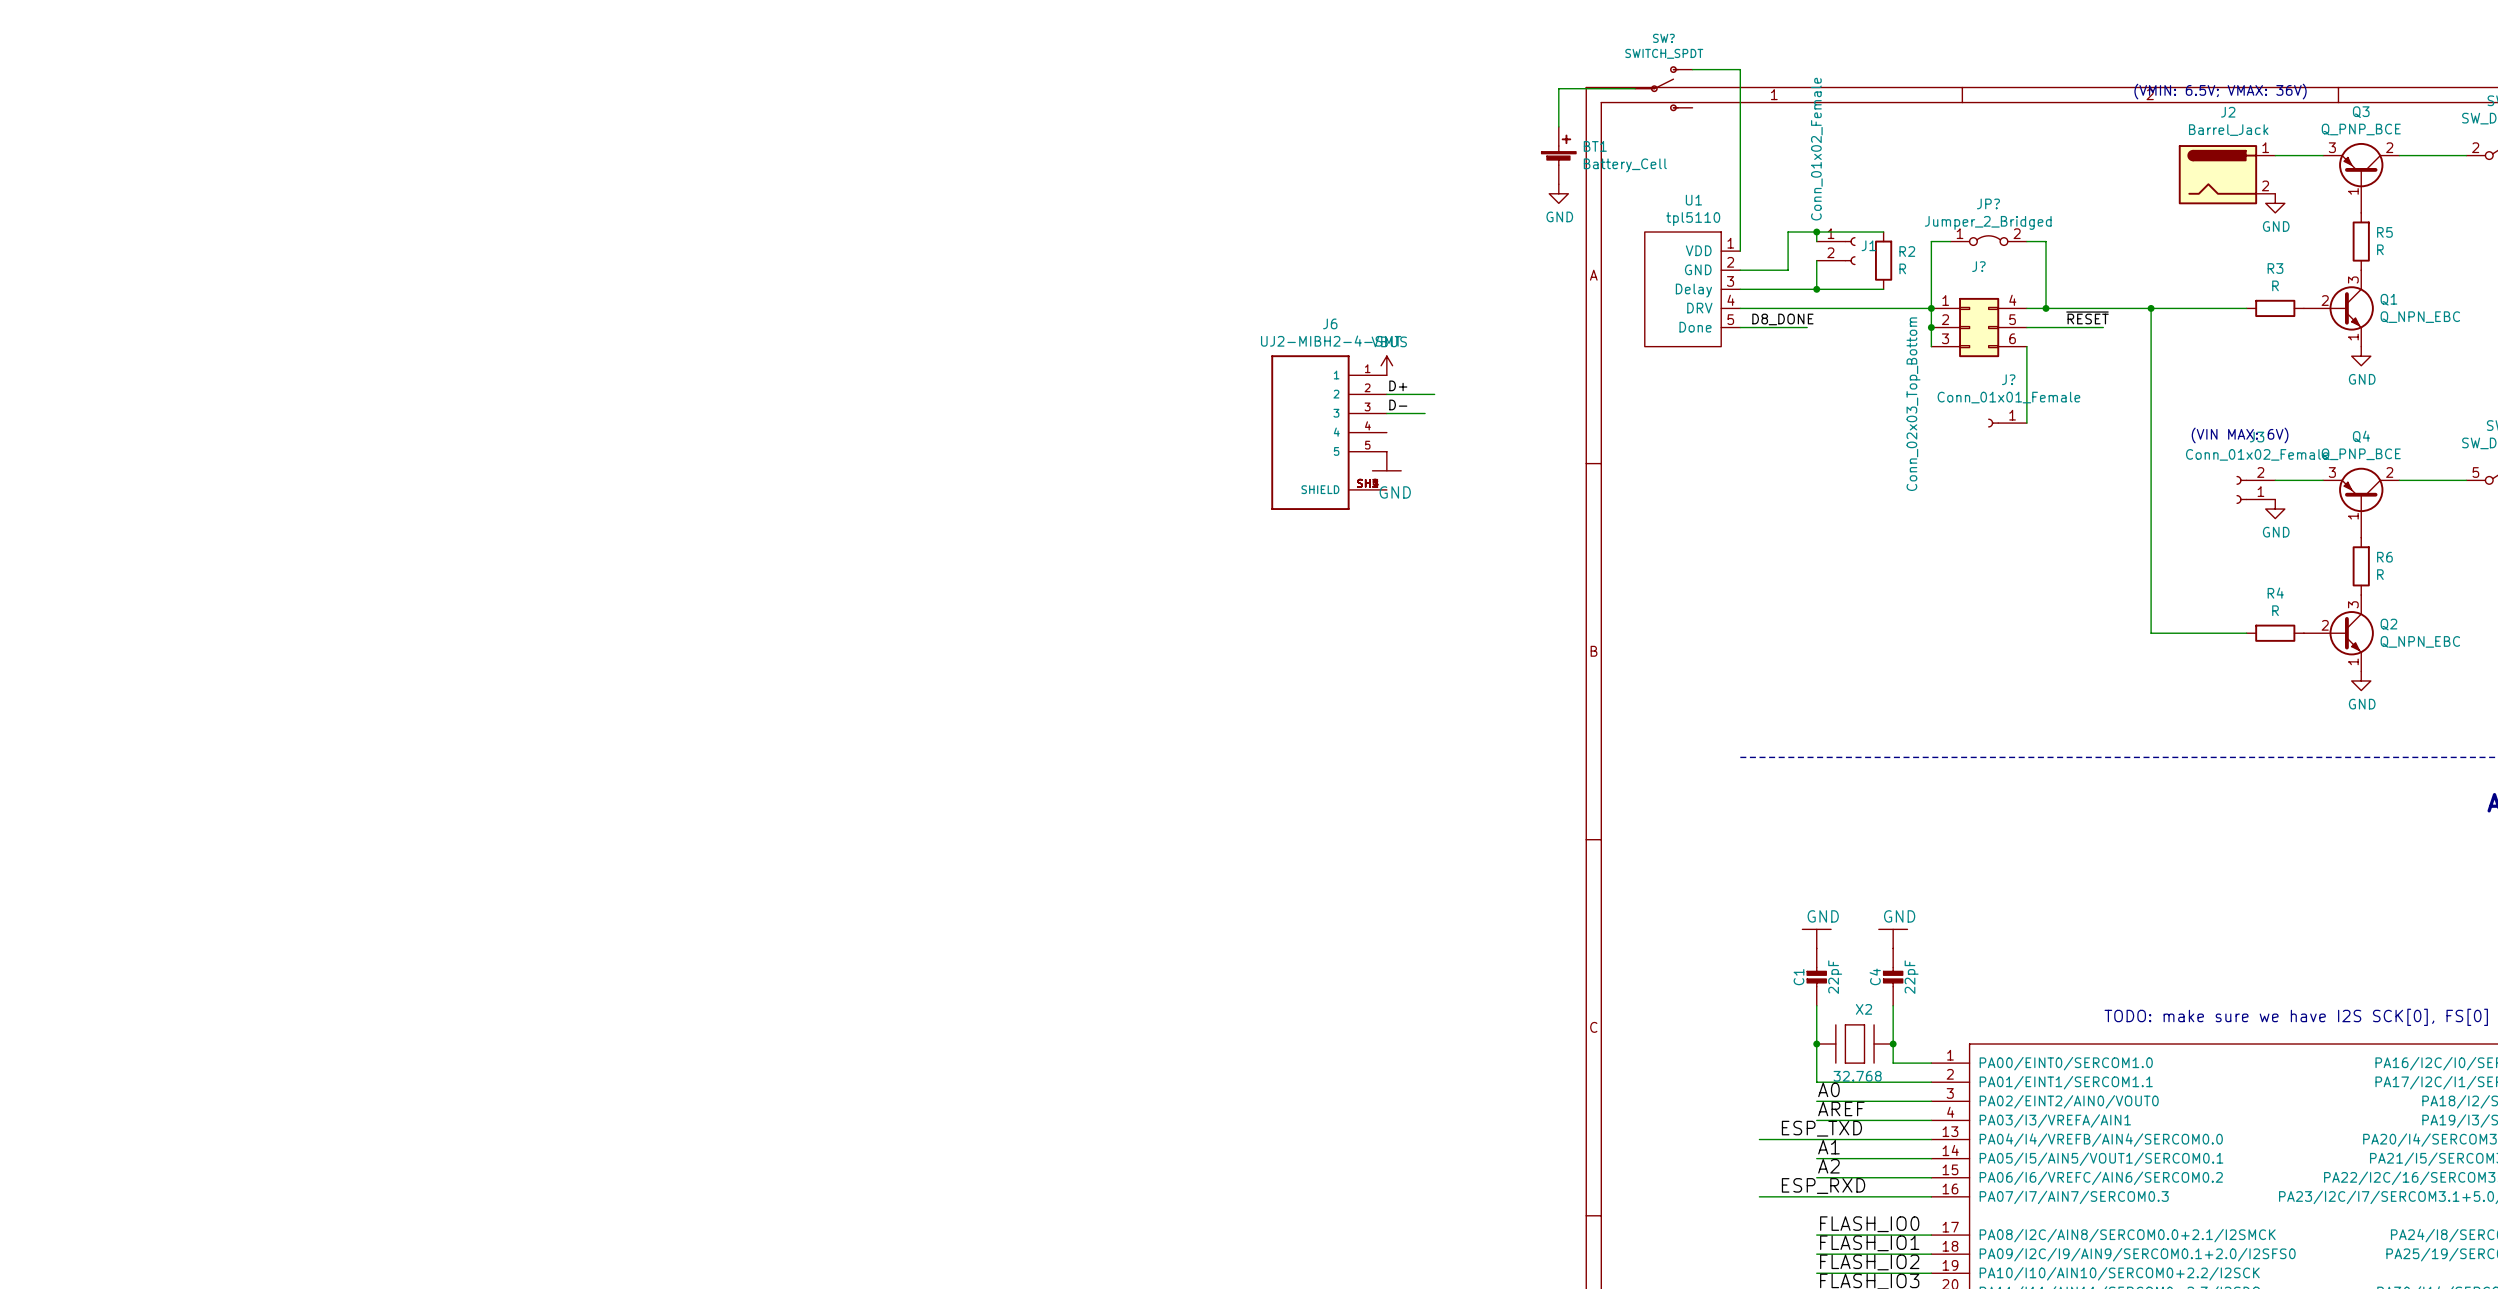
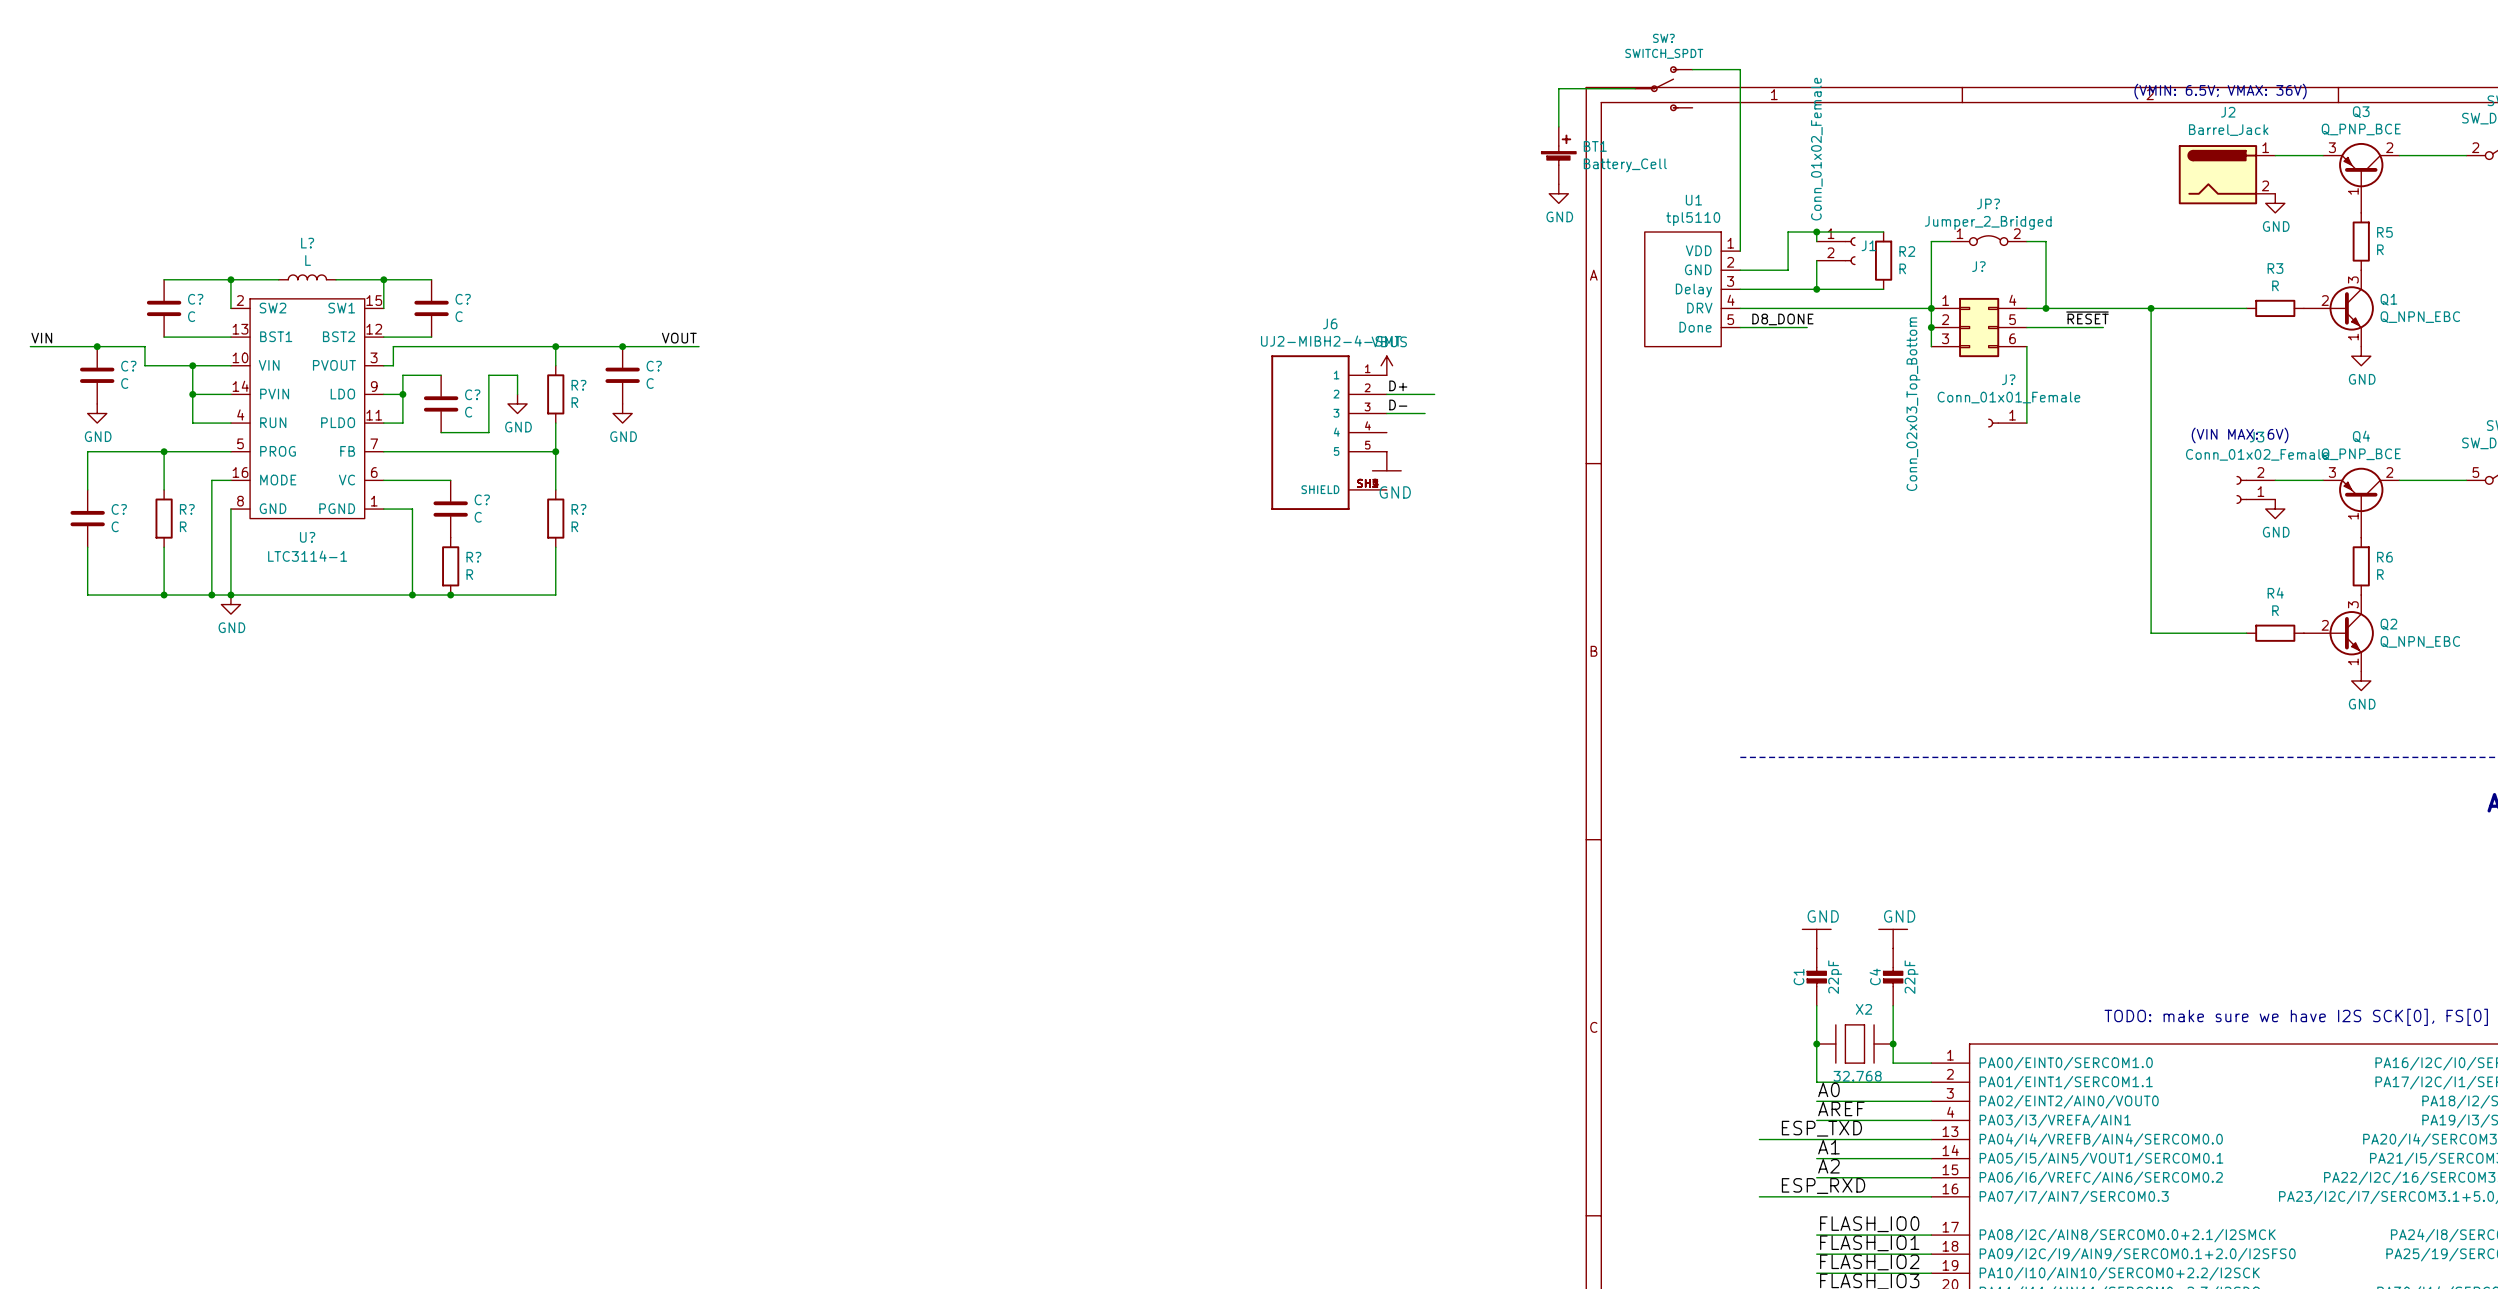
L?: none -> L (307, 277)
wire: none -> (164, 279) (278, 279)
wire: none -> (230, 279) (230, 308)
junction: none -> (230, 279)
wire: none -> (336, 279) (431, 279)
wire: none -> (383, 279) (383, 308)
junction: none -> (383, 279)
C?: none -> C (164, 308)
C?: none -> C (431, 308)
wire: none -> (164, 337) (230, 337)
wire: none -> (383, 337) (431, 337)
label: none -> VIN (41, 338)
label: none -> VOUT (679, 338)
wire: none -> (30, 346) (144, 346) (144, 365) (230, 365)
junction: none -> (97, 346)
wire: none -> (555, 346) (555, 365)
junction: none -> (555, 346)
junction: none -> (622, 346)
wire: none -> (699, 346) (393, 346) (393, 365) (383, 365)
wire: none -> (192, 365) (192, 423) (230, 423)
junction: none -> (192, 365)
C?: none -> C (97, 375)
wire: none -> (441, 375) (402, 375) (402, 423) (383, 423)
C?: none -> C (622, 375)
wire: none -> (192, 394) (230, 394)
junction: none -> (192, 394)
wire: none -> (383, 394) (402, 394)
junction: none -> (402, 394)
wire: none -> (517, 394) (517, 375) (488, 375) (488, 432) (441, 432)
R?: none -> R (555, 394)
C?: none -> C (441, 403)
power symbol: none -> GND (517, 403)
U?: none -> LTC3114-1 (307, 408)
power symbol: none -> GND (97, 413)
power symbol: none -> GND (622, 413)
wire: none -> (555, 423) (555, 489)
wire: none -> (164, 451) (164, 489)
junction: none -> (164, 451)
wire: none -> (230, 451) (87, 451) (87, 489)
wire: none -> (383, 451) (555, 451)
junction: none -> (555, 451)
wire: none -> (230, 480) (211, 480) (211, 595)
wire: none -> (383, 480) (450, 480)
wire: none -> (230, 509) (230, 595)
wire: none -> (383, 509) (412, 509) (412, 595)
C?: none -> C (450, 509)
C?: none -> C (87, 518)
R?: none -> R (164, 518)
R?: none -> R (555, 518)
wire: none -> (87, 547) (87, 595) (555, 595) (555, 547)
wire: none -> (164, 547) (164, 595)
R?: none -> R (450, 566)
junction: none -> (164, 595)
junction: none -> (211, 595)
junction: none -> (230, 595)
junction: none -> (412, 595)
junction: none -> (450, 595)
power symbol: none -> GND (230, 604)

